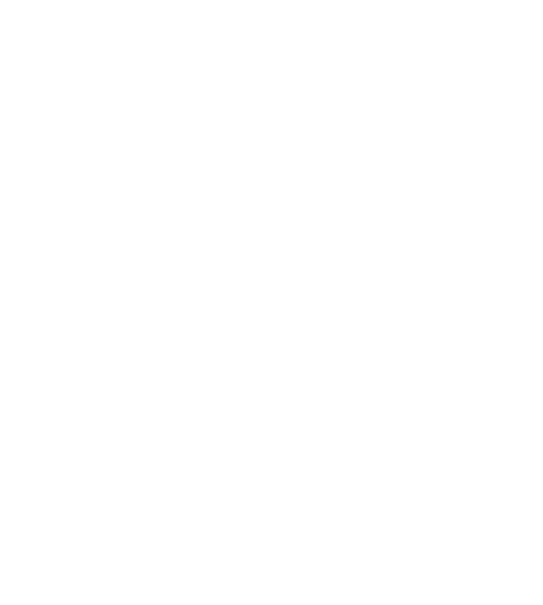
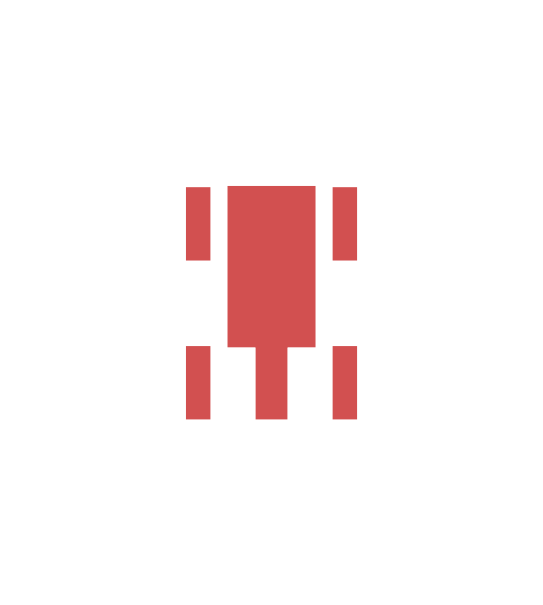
part: none -> (271, 302)

